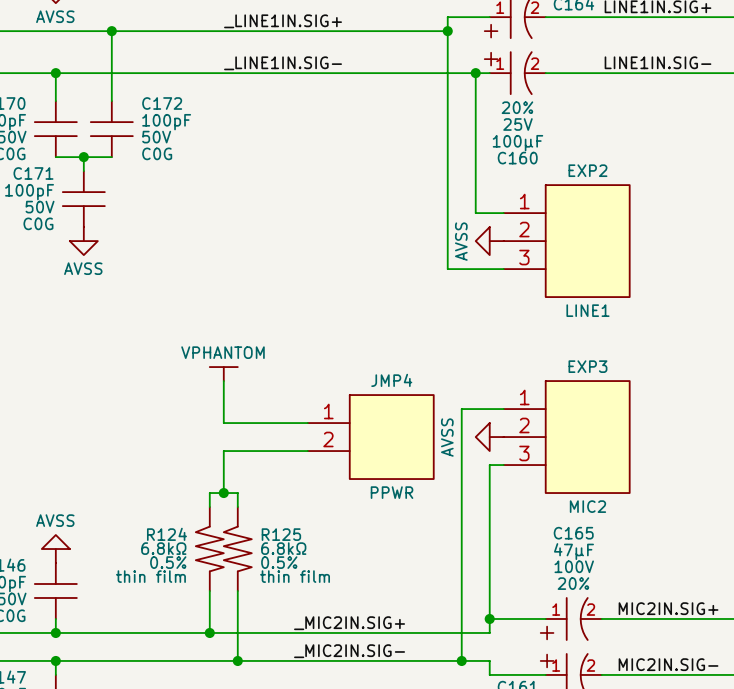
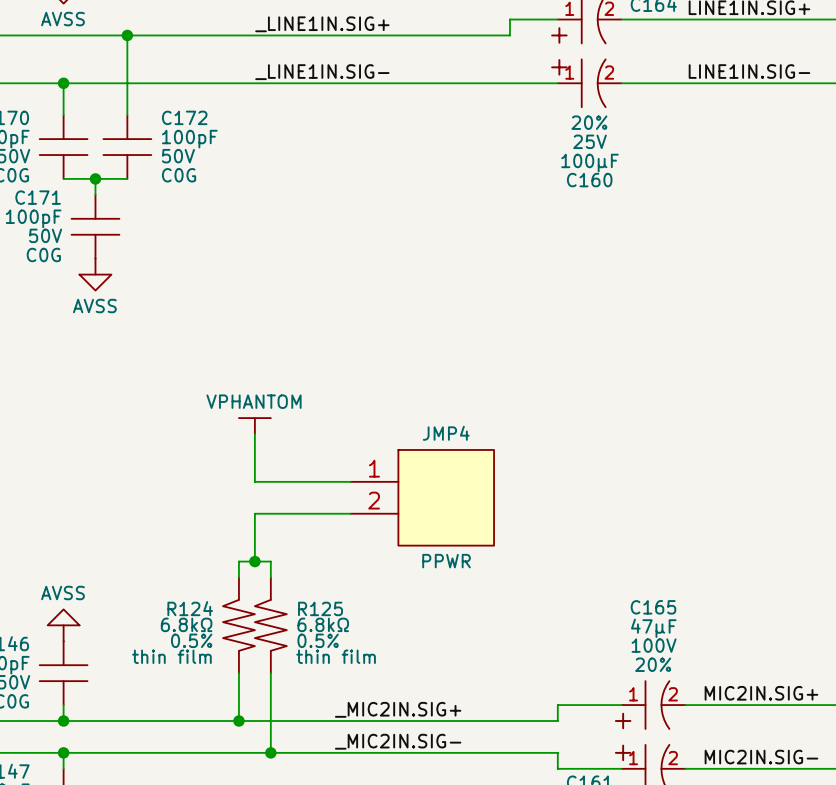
wire: (447, 31) (447, 269) (503, 269) -> none
junction: (447, 31) -> none
wire: (475, 73) (475, 213) (503, 213) -> none
junction: (475, 73) -> none
power symbol: AVSS (489, 241) -> none
EXP2: LINE1 (566, 241) -> none
wire: (503, 409) (461, 409) (461, 660) -> none
power symbol: AVSS (489, 437) -> none
EXP3: MIC2 (566, 437) -> none
wire: (503, 465) (489, 465) (489, 618) -> none
junction: (489, 618) -> none
junction: (461, 660) -> none

